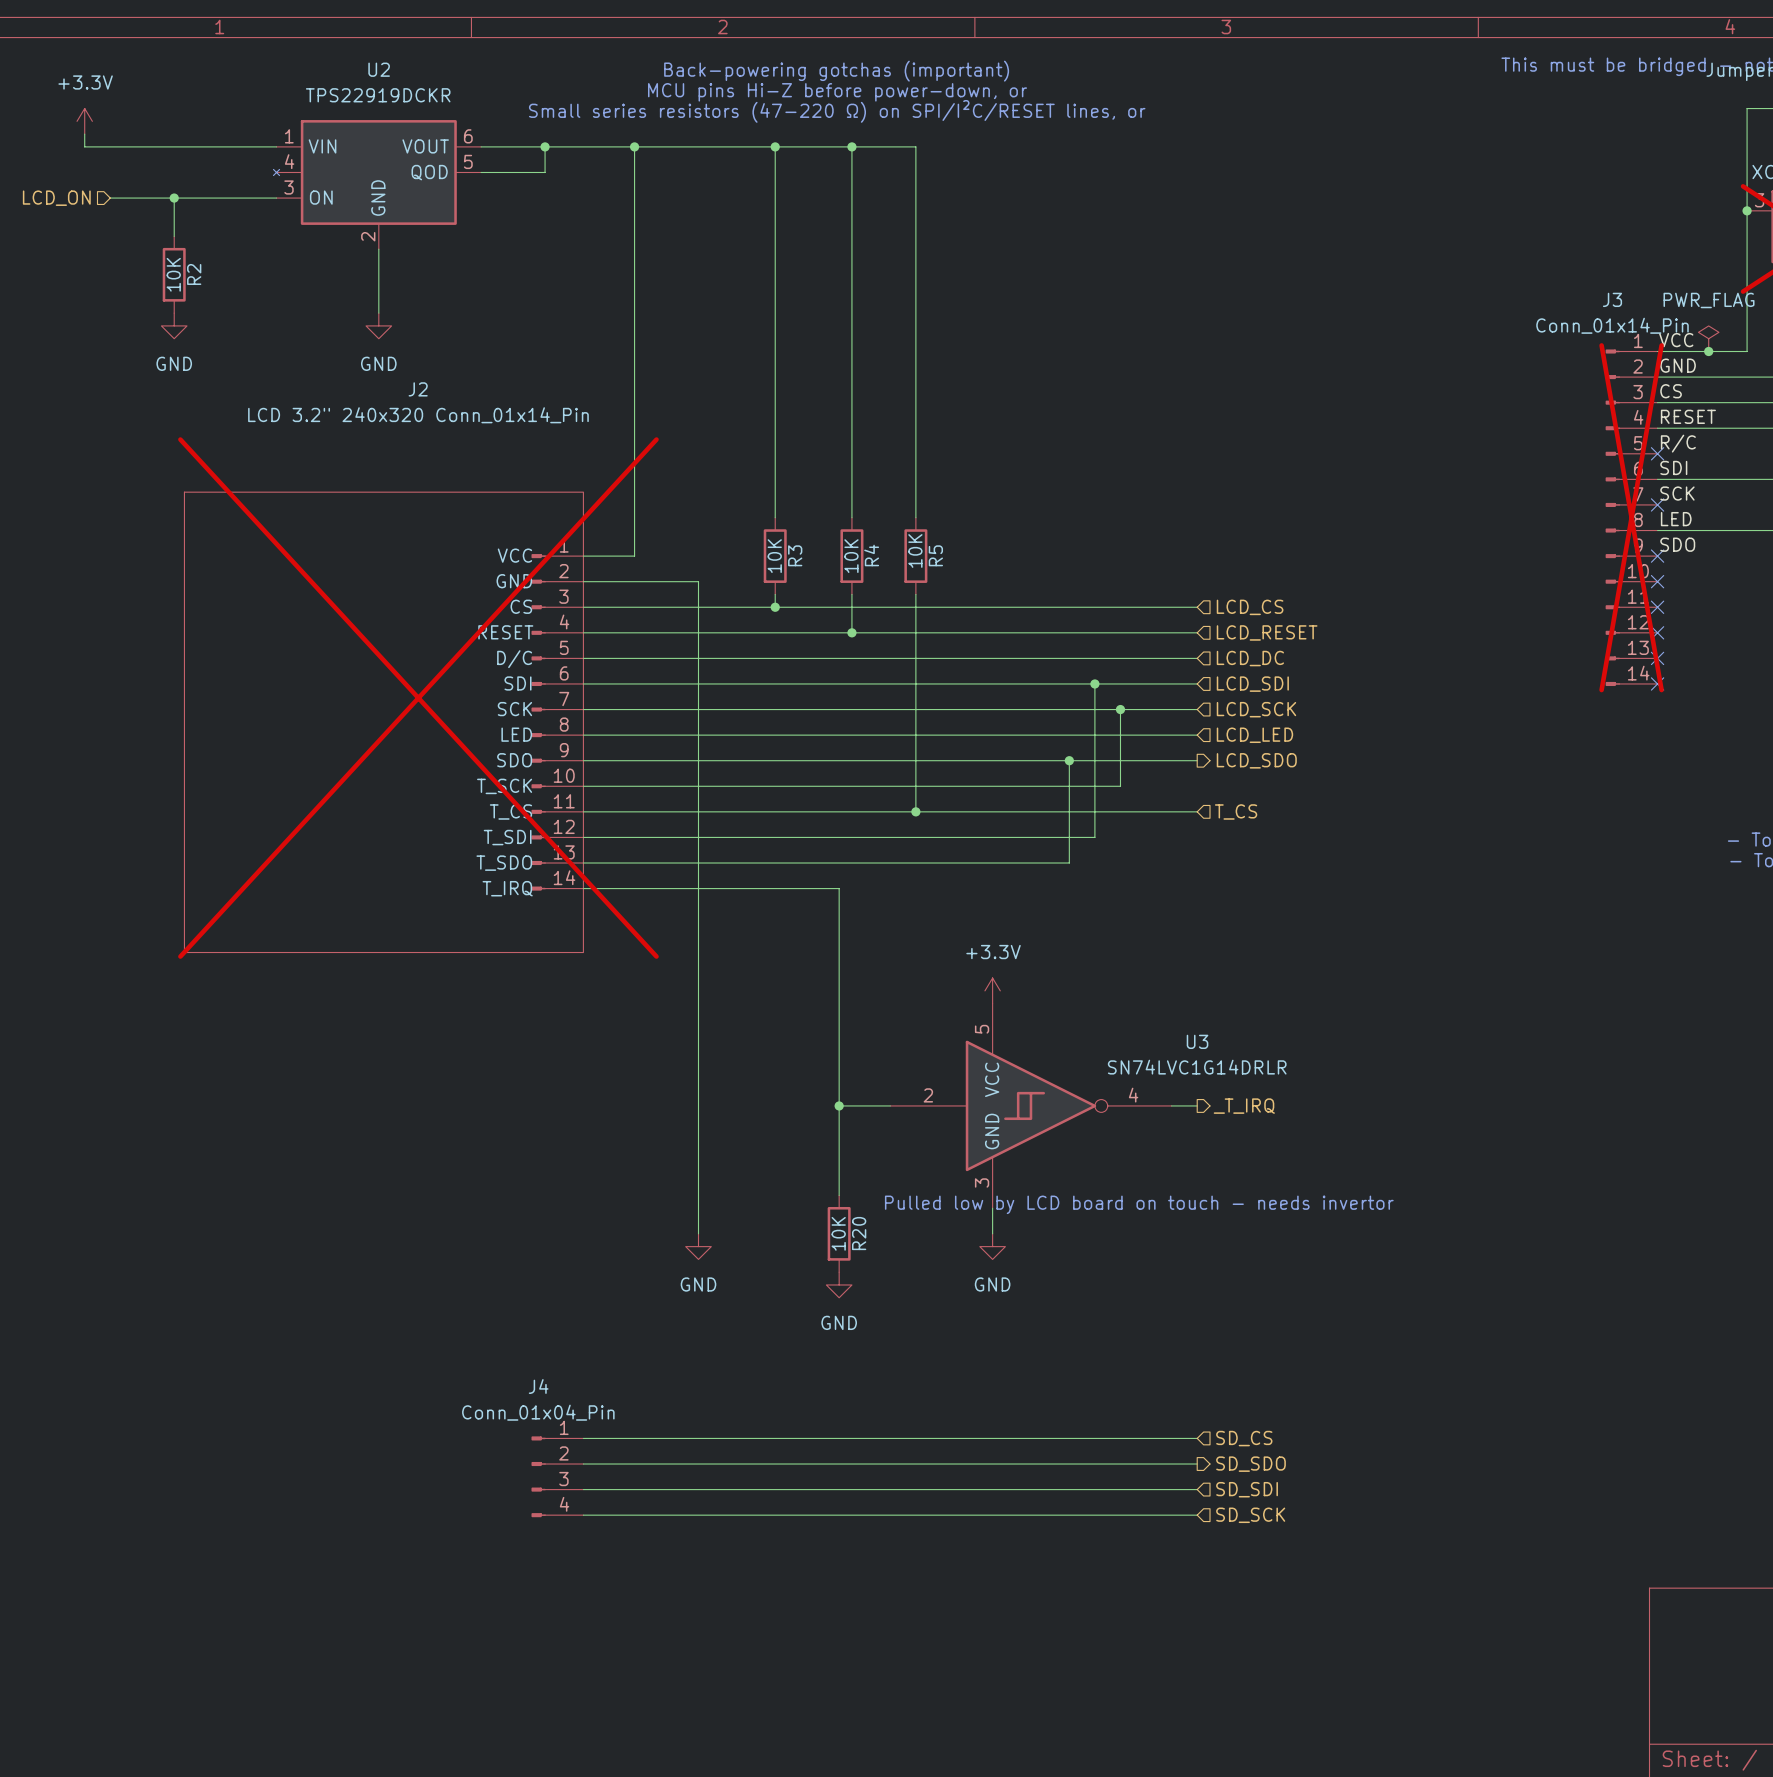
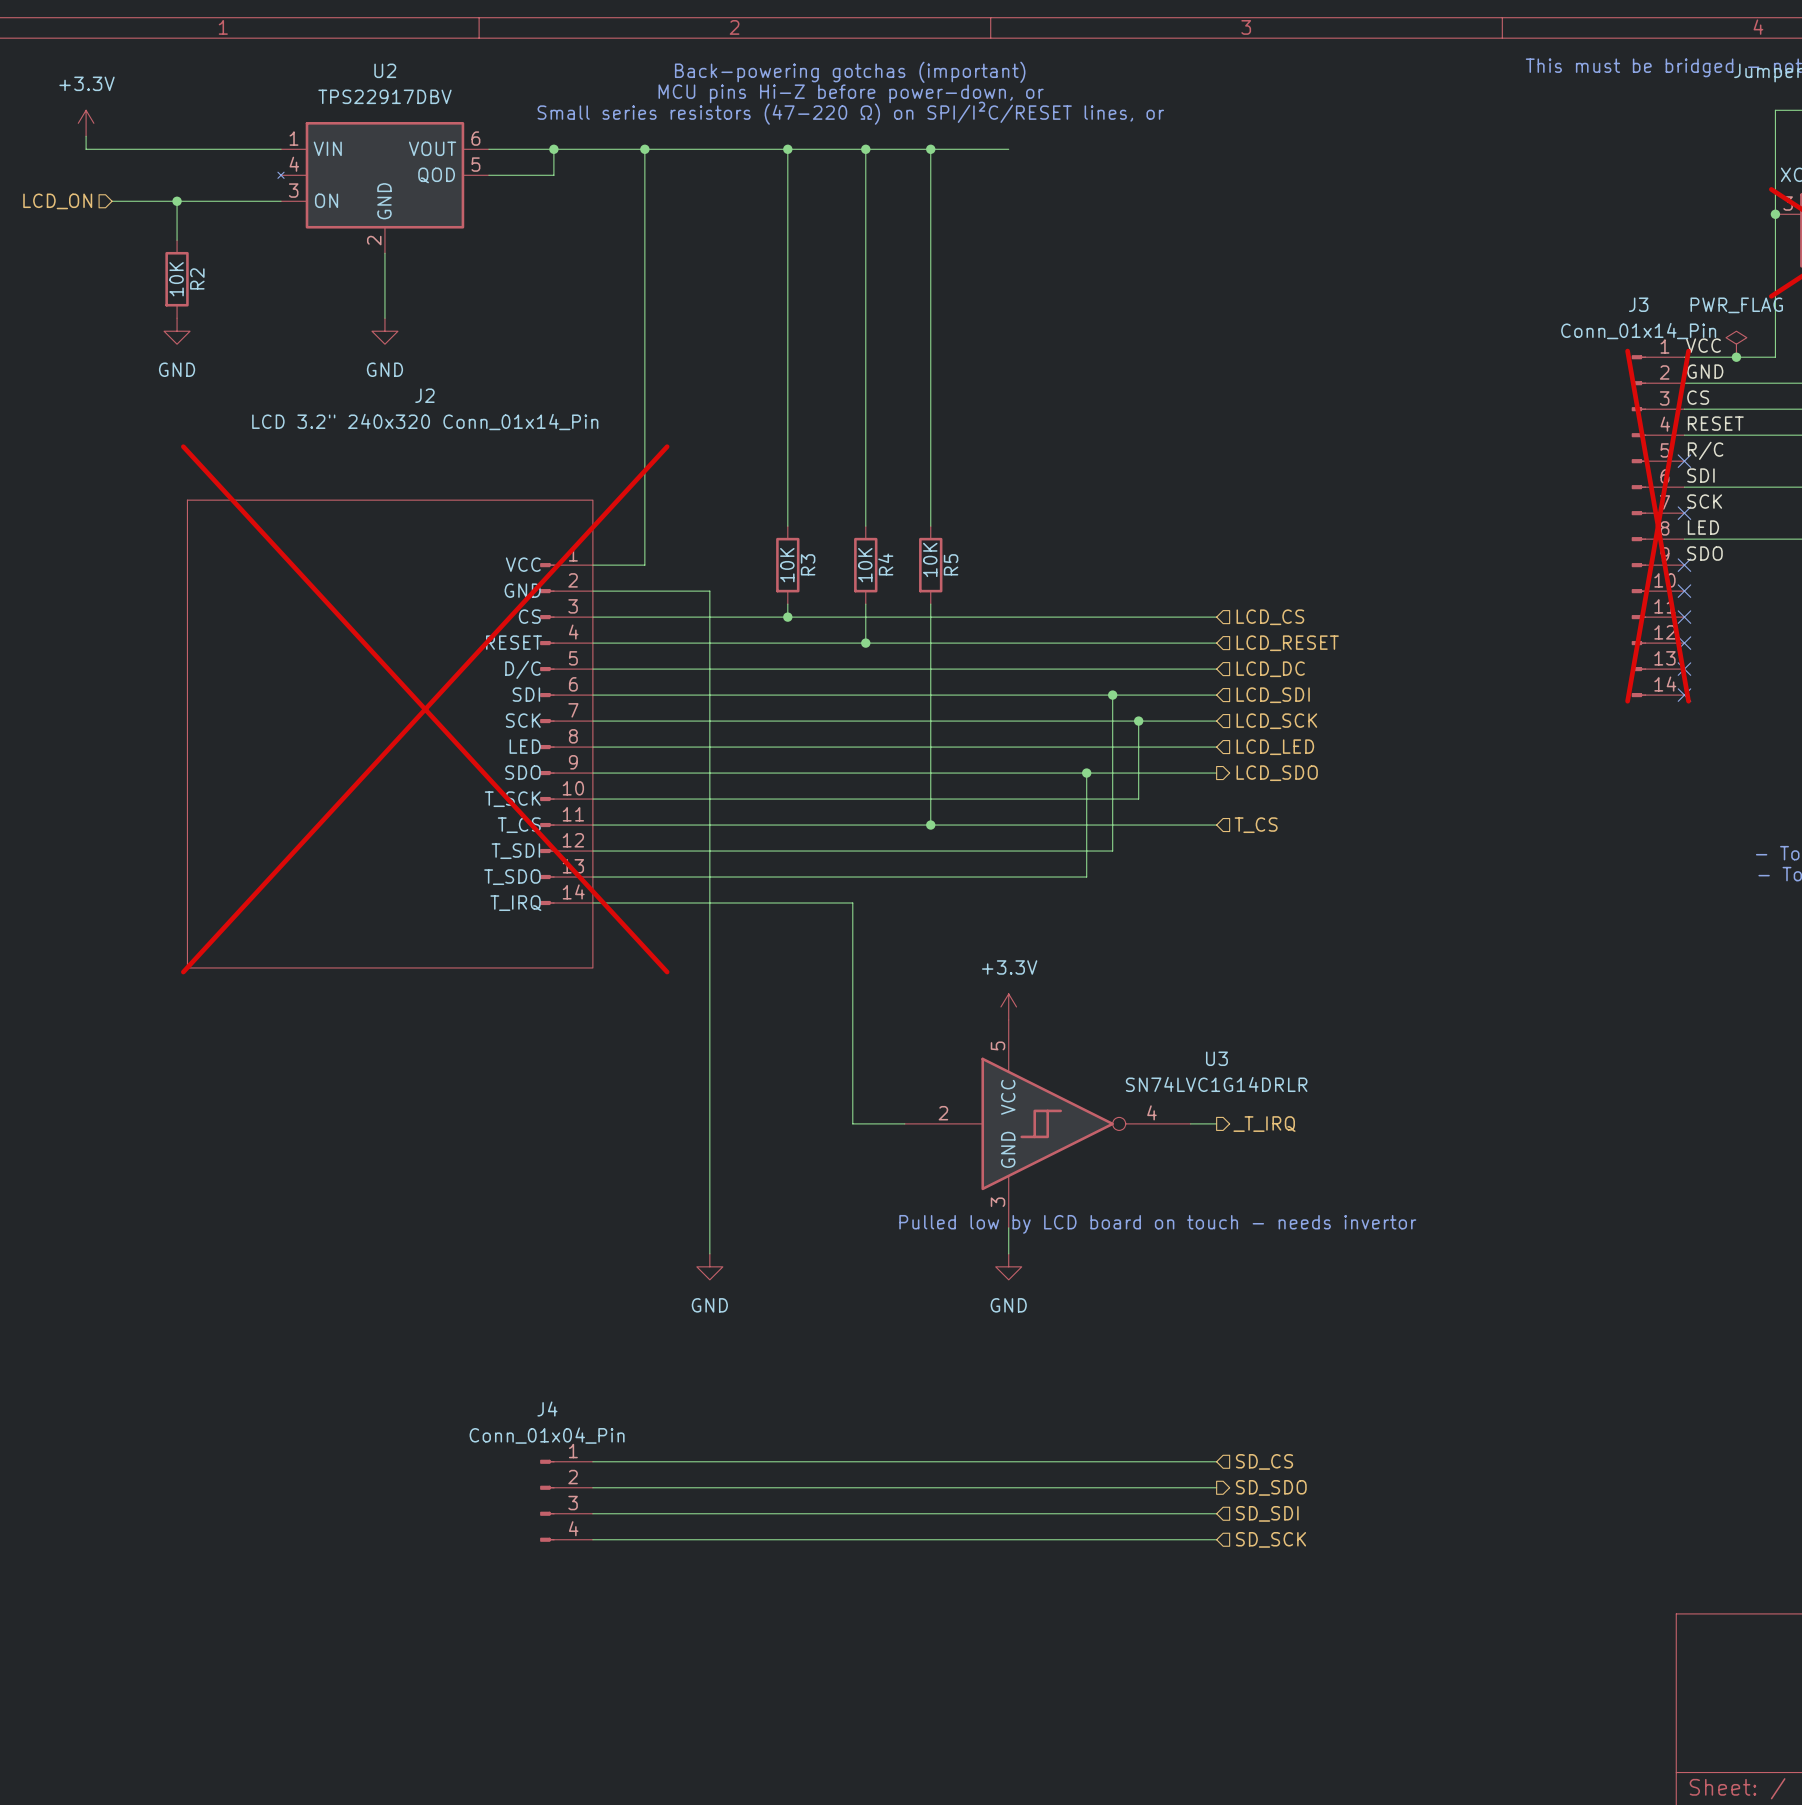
U2 value: TPS22919DCKR (378, 95) -> TPS22917DBV (384, 96)
wire: none -> (930, 149) (1008, 149)
junction: none -> (930, 149)
wire: (839, 1105) (839, 1195) -> none
junction: (839, 1105) -> none
R20: 10K (839, 1233) -> none
power symbol: GND (839, 1284) -> none

